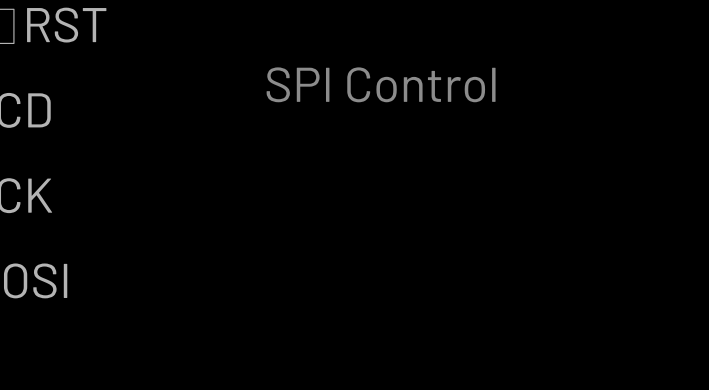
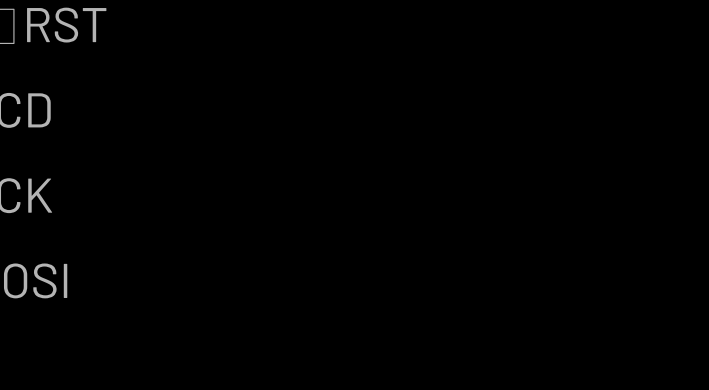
text: SPI Control (381, 84) -> none

